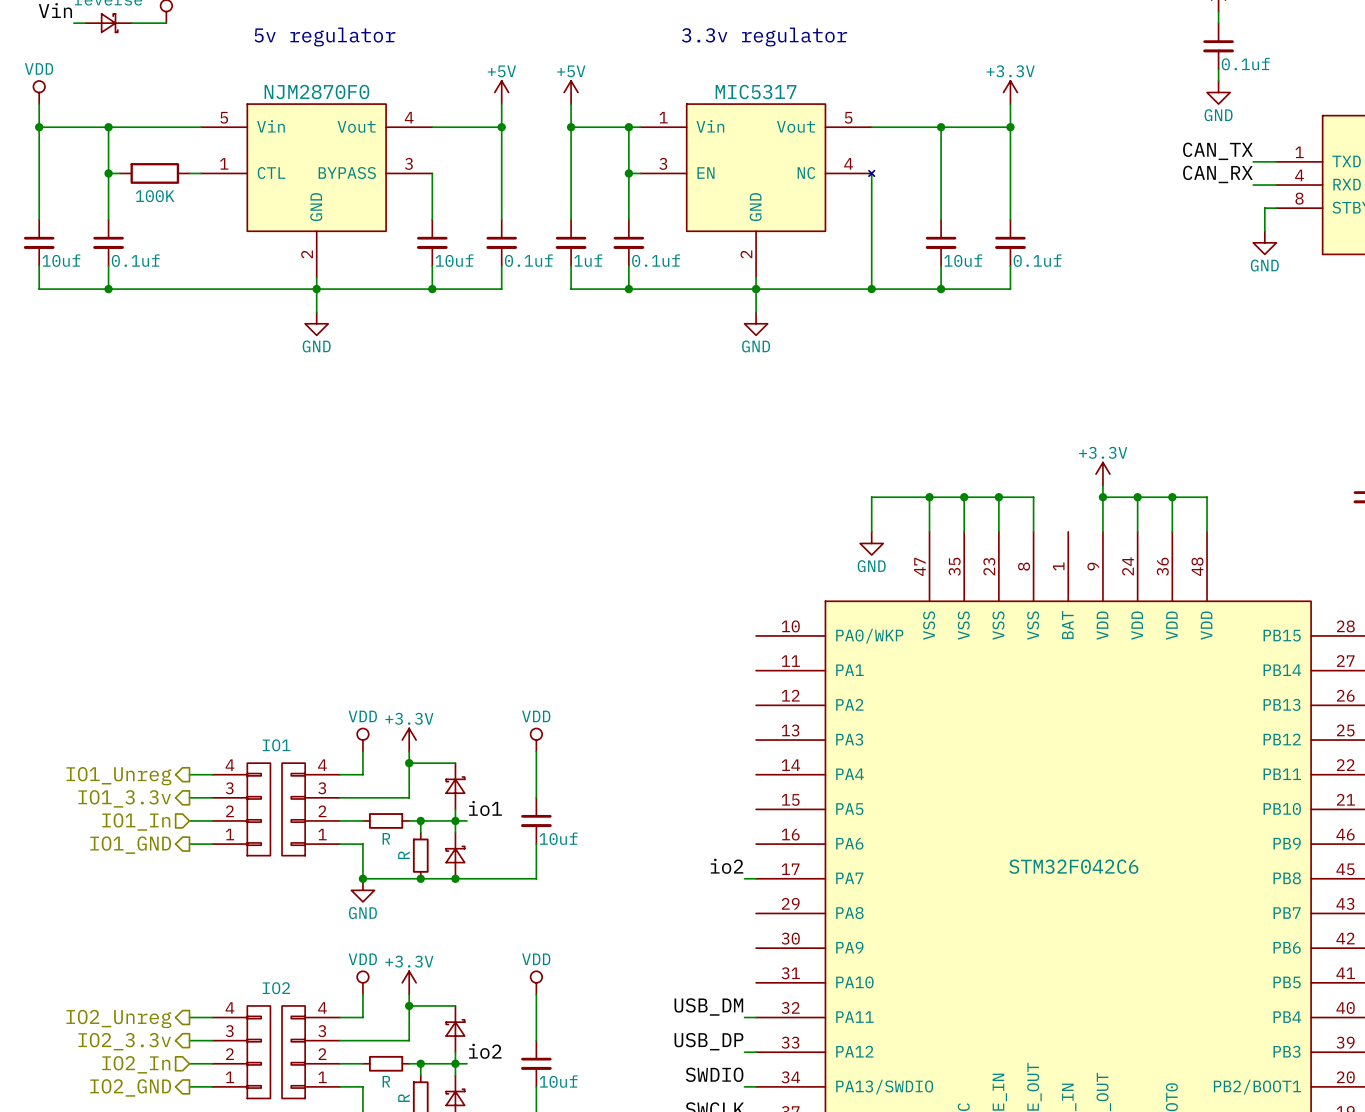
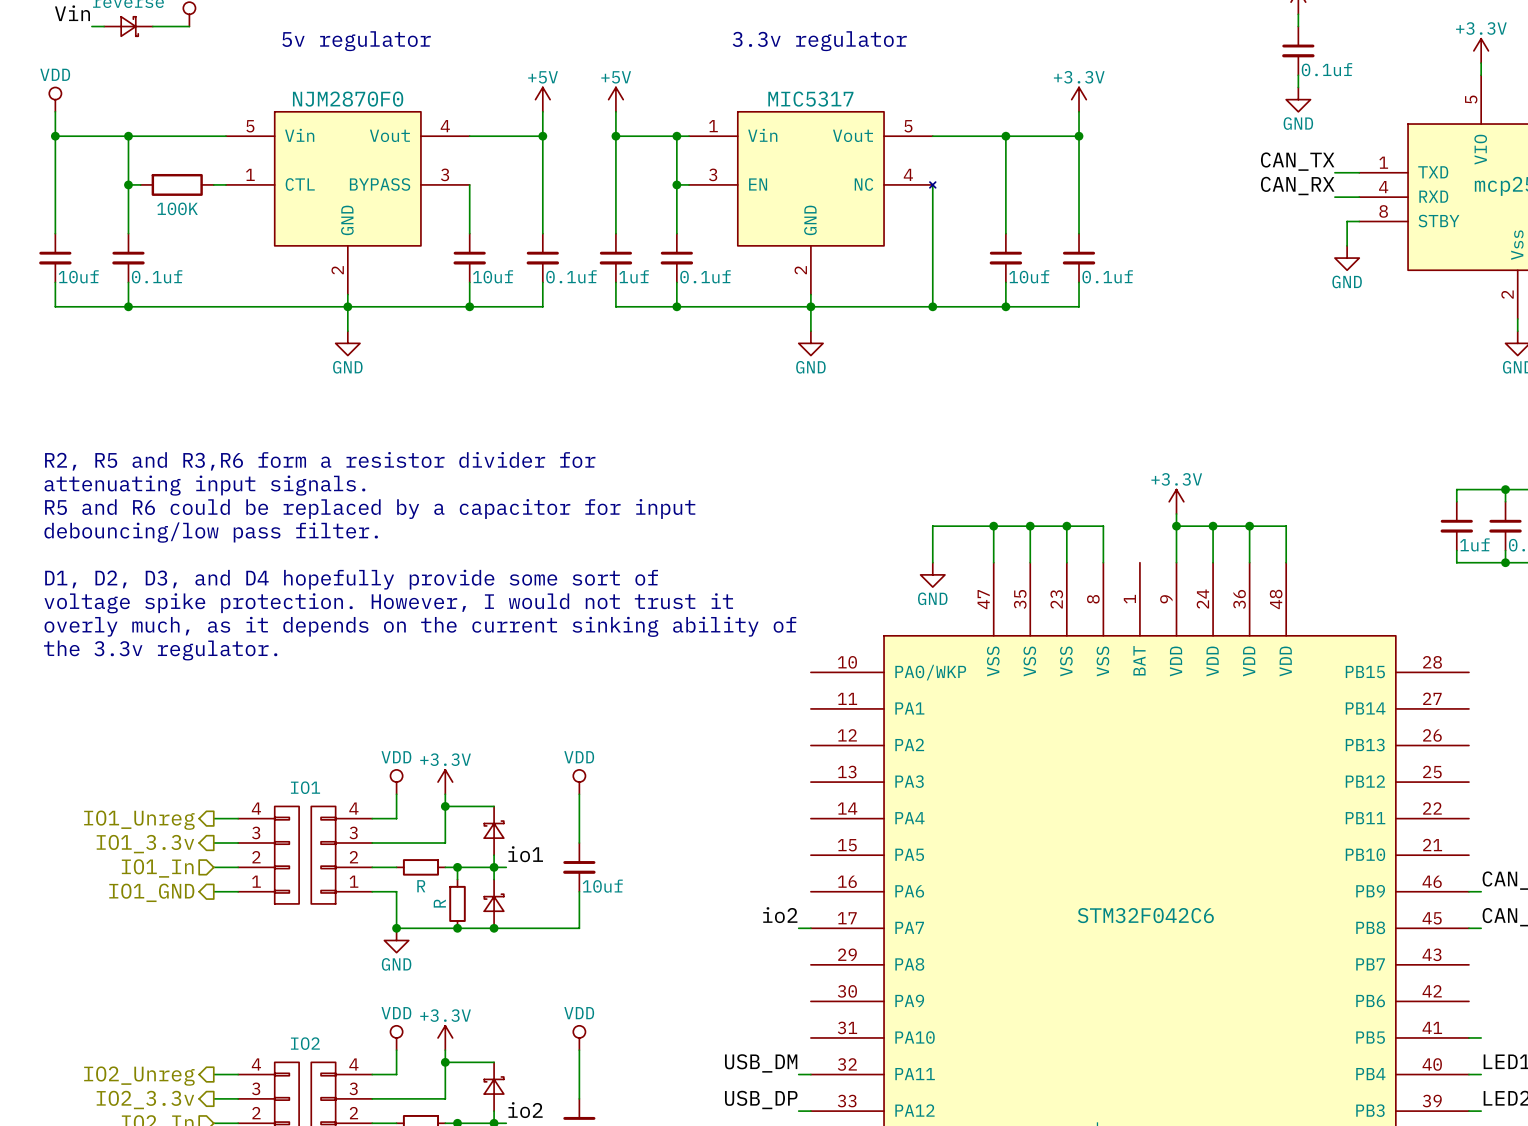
text: none -> R2, R5 and R3,R6 form a resistor divider for (320, 461)
text: none -> attenuating input signals. (204, 485)
text: none -> R5 and R6 could be replaced by a capacitor for input (370, 509)
text: none -> debouncing/low pass filter. (211, 532)
text: none -> D1, D2, D3, and D4 hopefully provide some sort of (351, 579)
text: none -> voltage spike protection. However, I would not trust it (388, 603)
text: none -> overly much, as it depends on the current sinking ability of (420, 626)
text: none -> the 3.3v regulator. (160, 650)

